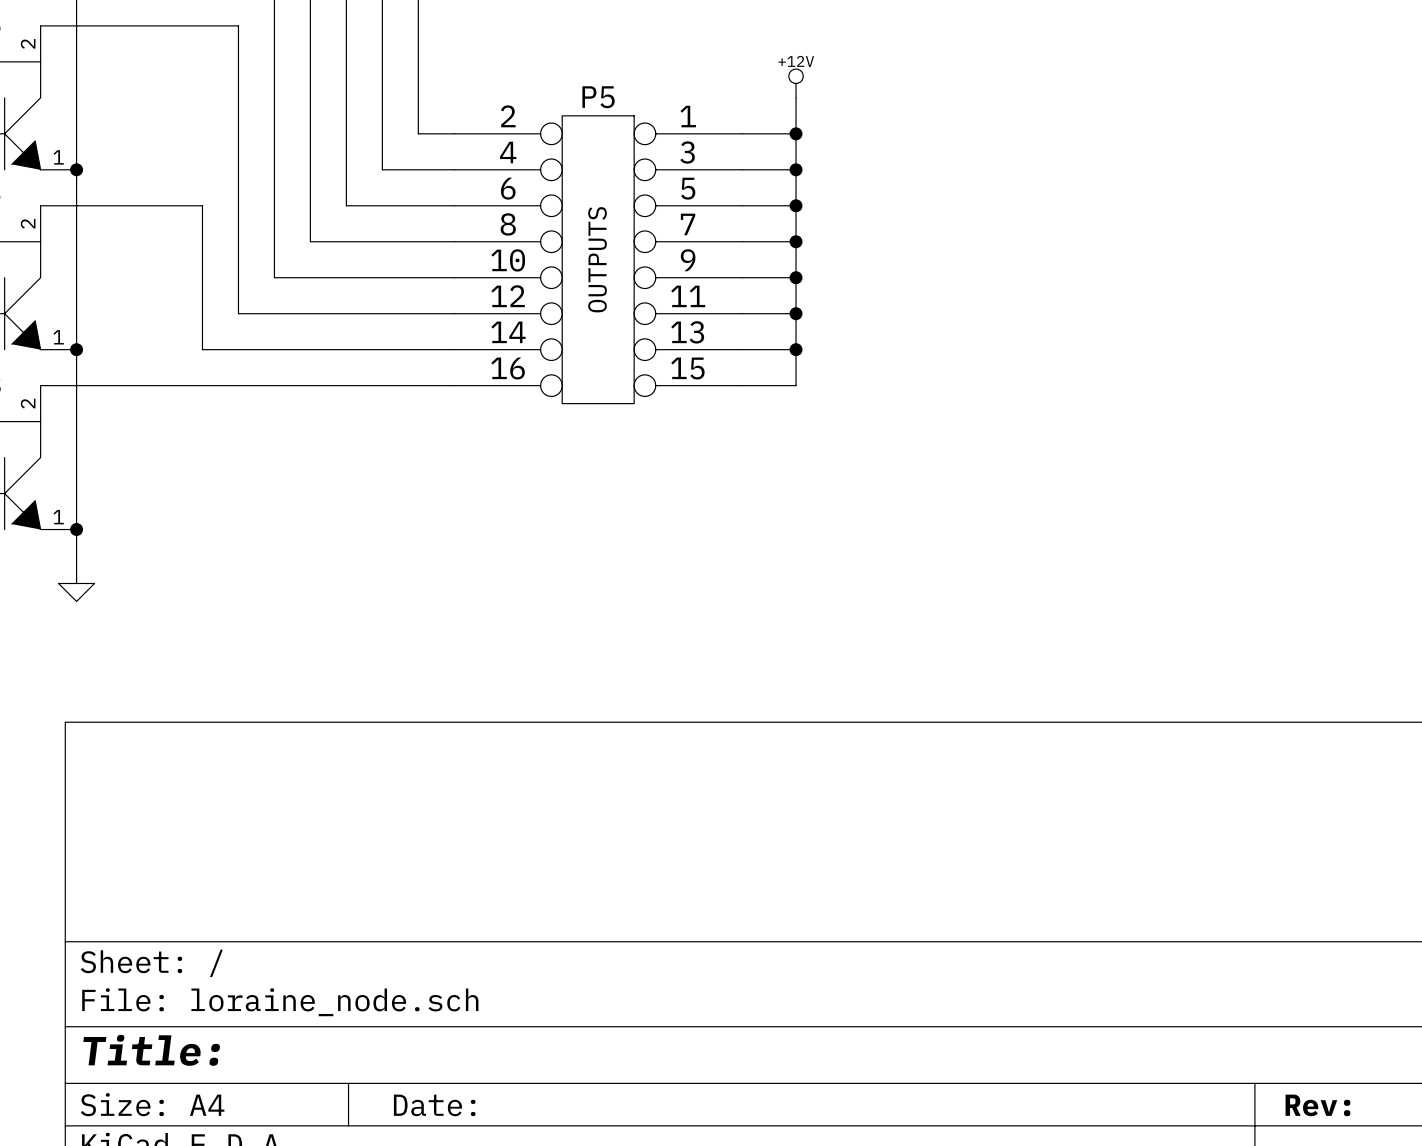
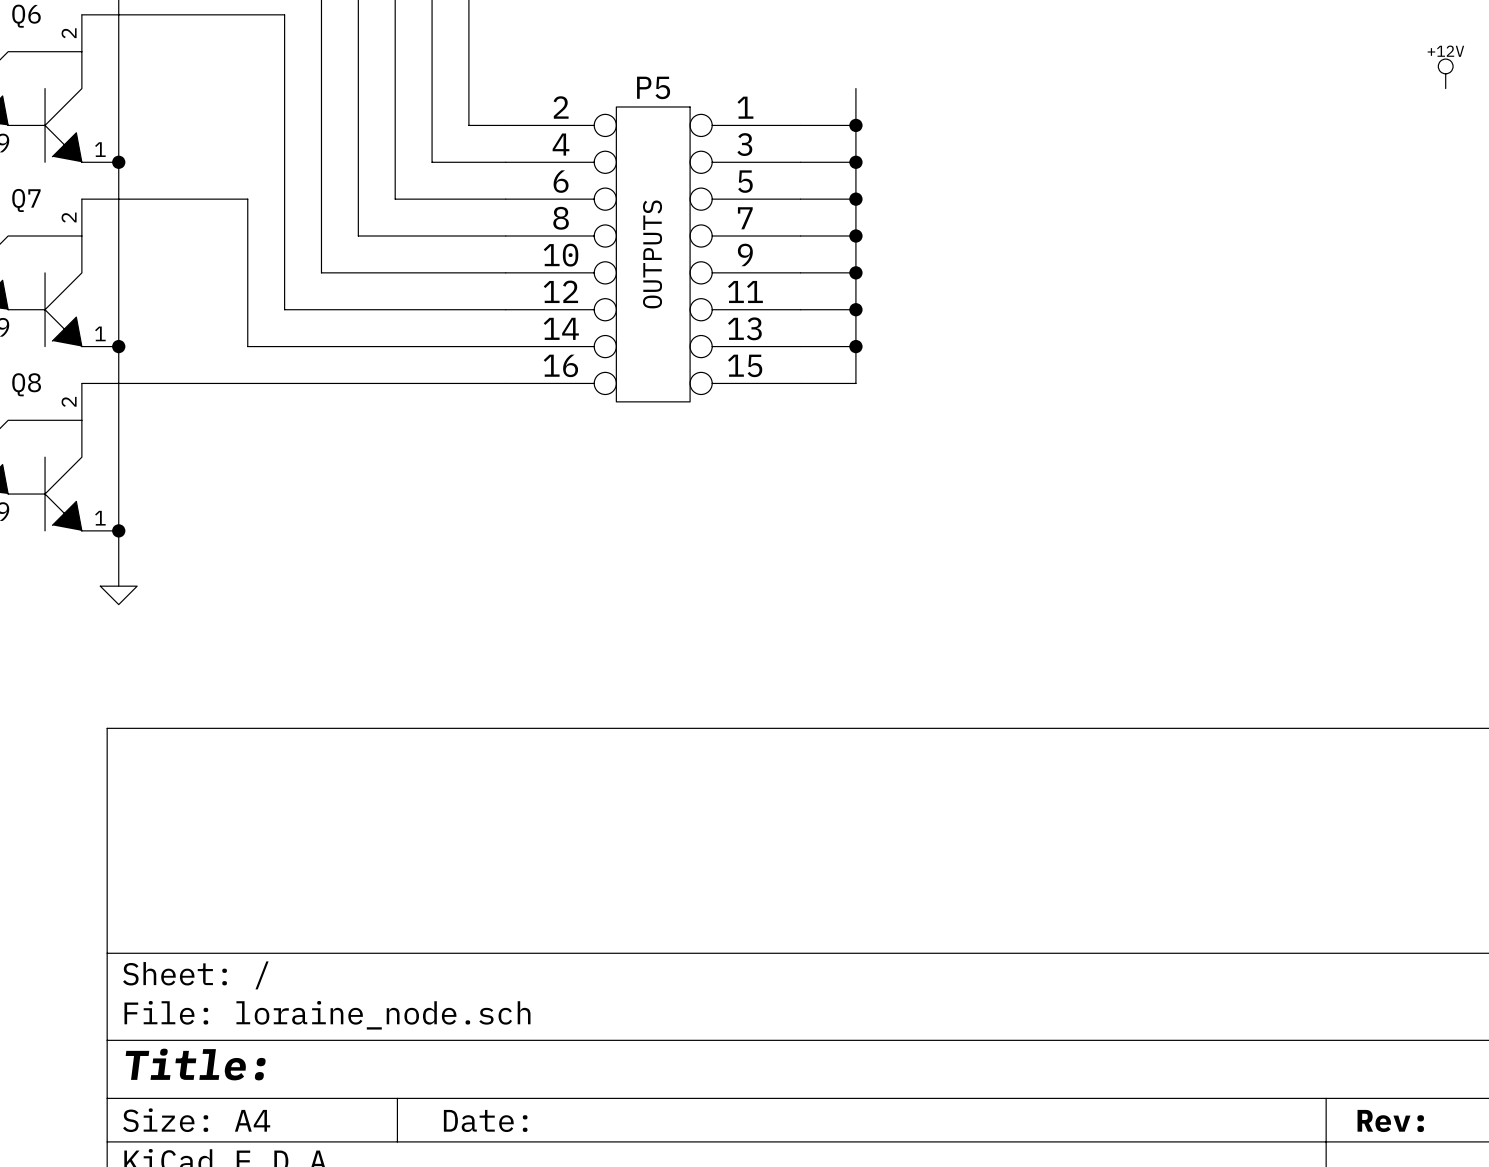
power symbol: +12V (796, 83) -> none
power symbol: none -> +12V (1445, 73)

